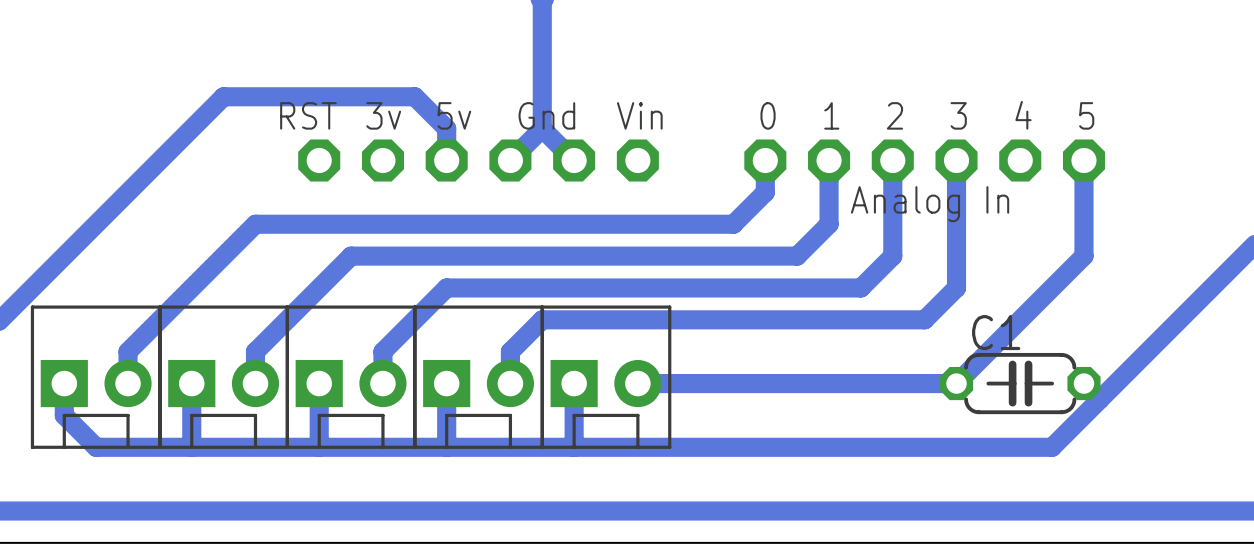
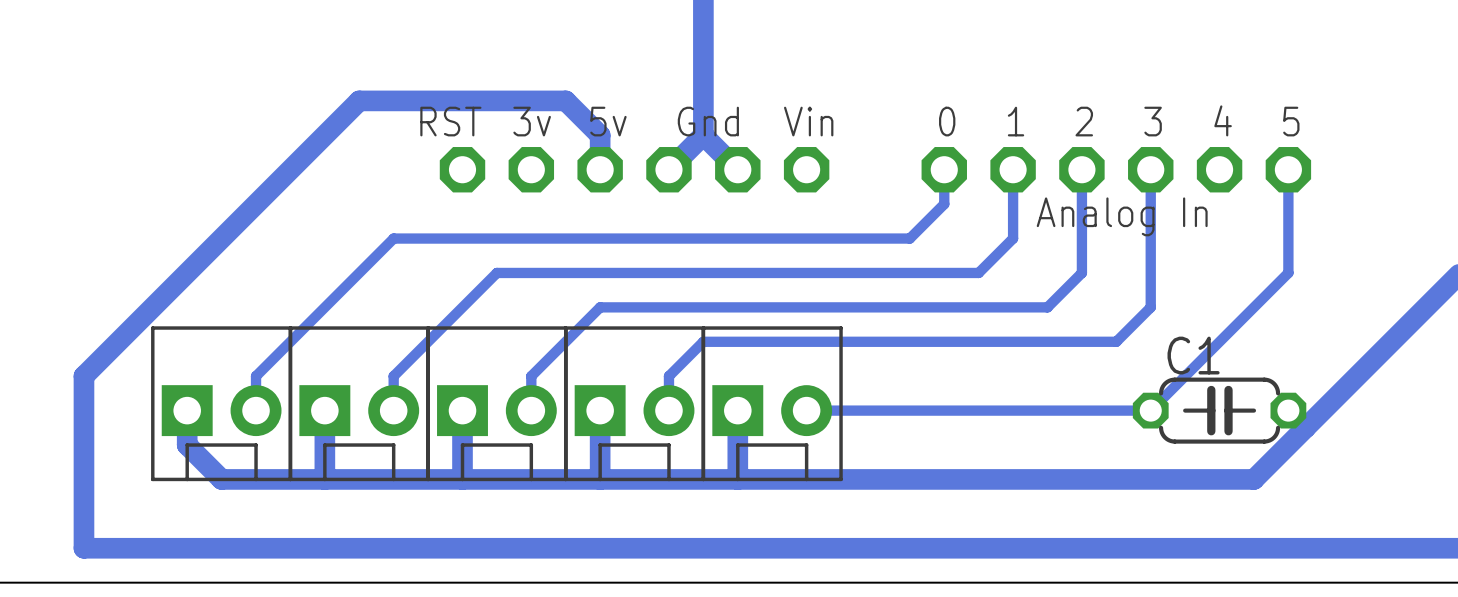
bottom track width: thick (765, 160) (765, 192) (733, 224) (255, 224) (128, 351) (128, 383) -> thin (944, 169) (944, 204) (909, 238) (393, 238) (256, 376) (256, 410)
bottom track width: thick (829, 160) (829, 224) (797, 256) (351, 256) (255, 351) (255, 383) -> thin (1013, 169) (1013, 238) (978, 272) (496, 272) (393, 376) (393, 410)
bottom track width: thick (892, 160) (892, 256) (860, 287) (446, 287) (382, 351) (382, 383) -> thin (1081, 169) (1081, 272) (1047, 307) (600, 307) (531, 376) (531, 410)
bottom track width: thick (956, 160) (956, 287) (924, 319) (542, 319) (510, 351) (510, 383) -> thin (1150, 169) (1150, 307) (1116, 341) (703, 341) (668, 376) (668, 410)
bottom track width: thick (1083, 160) (1083, 256) (956, 383) (637, 383) -> thin (1288, 169) (1288, 272) (1150, 410) (806, 410)

